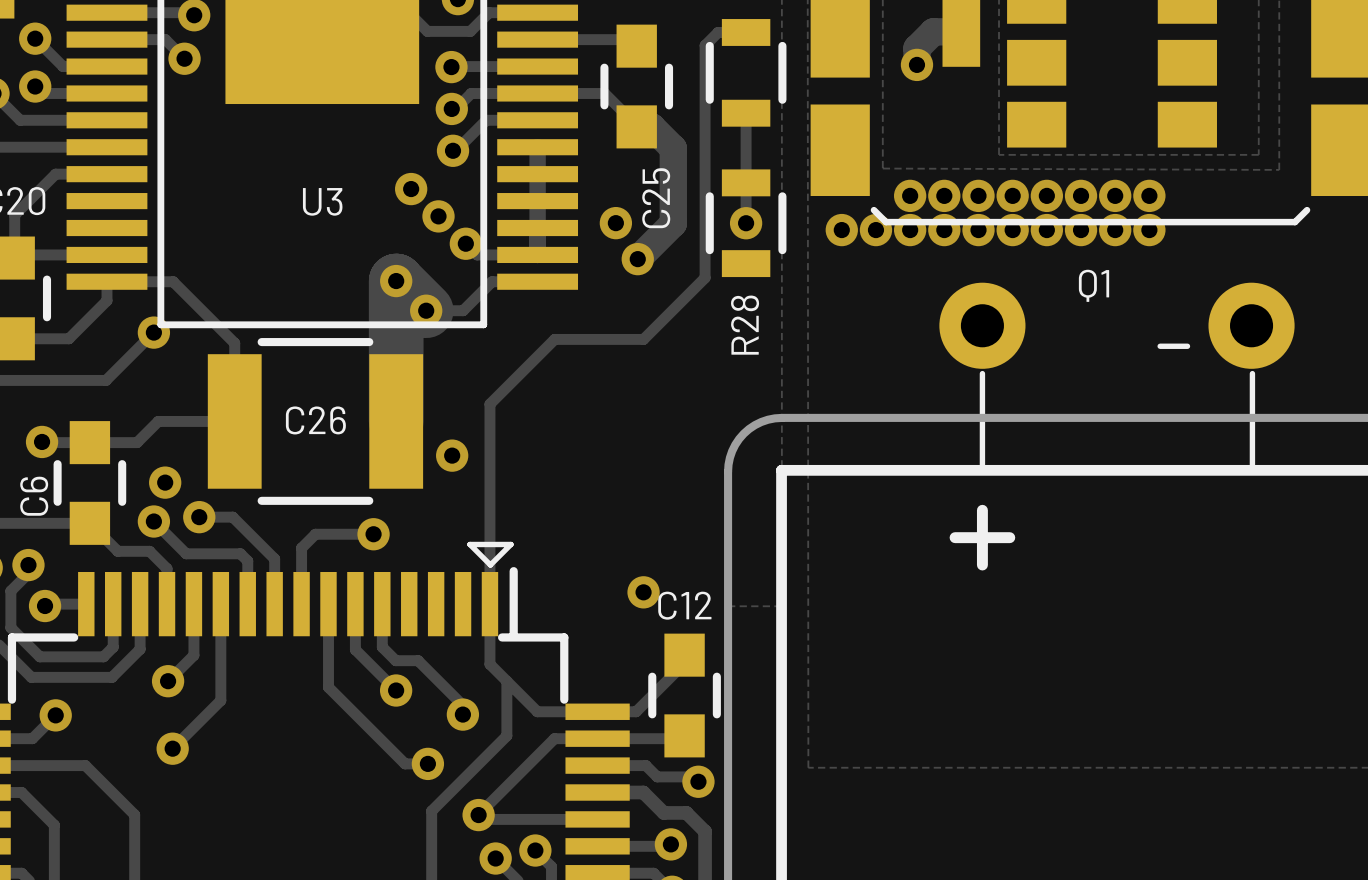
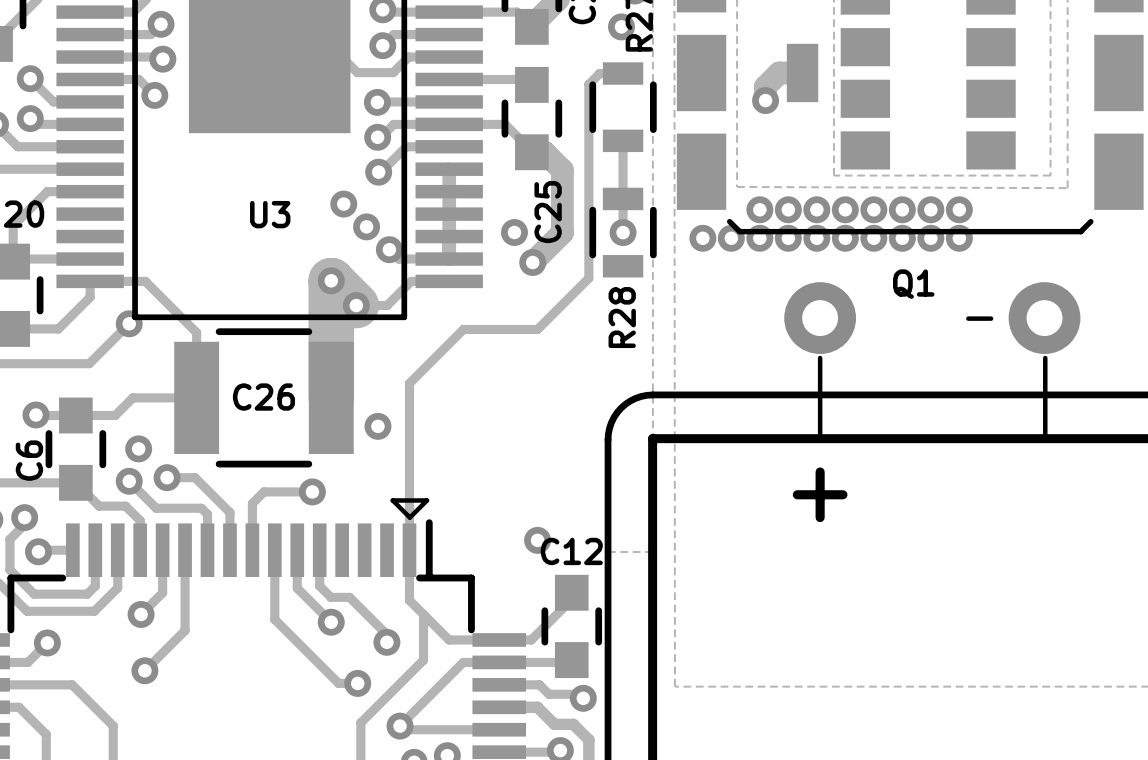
line: (1160, 346) (1187, 346) -> (968, 318) (991, 318)

